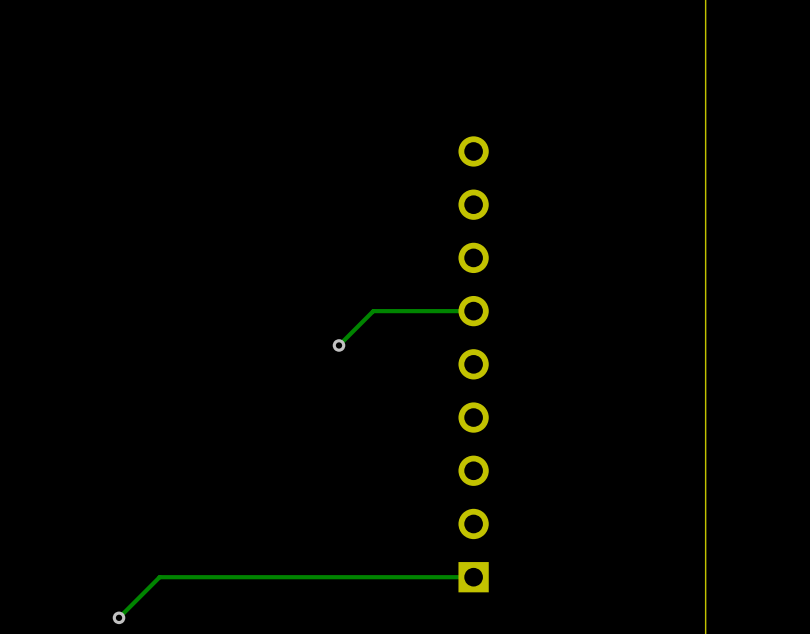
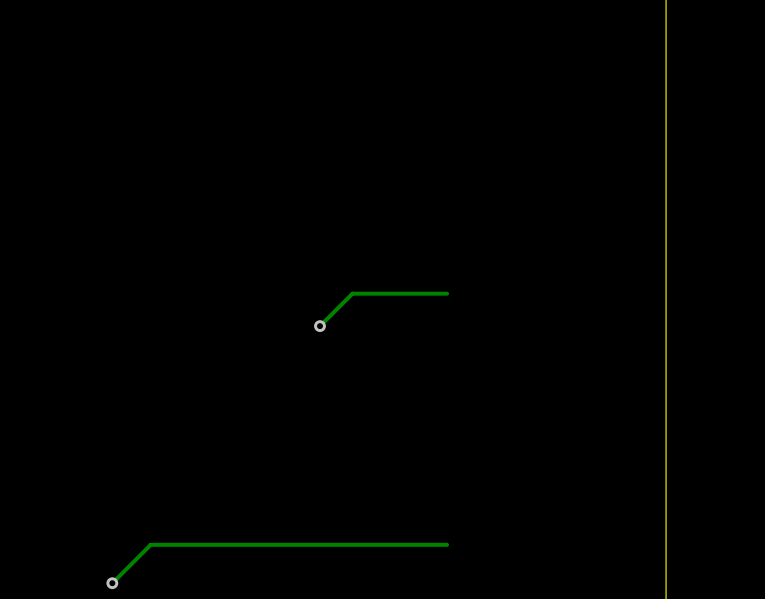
part: (473, 364) -> none

